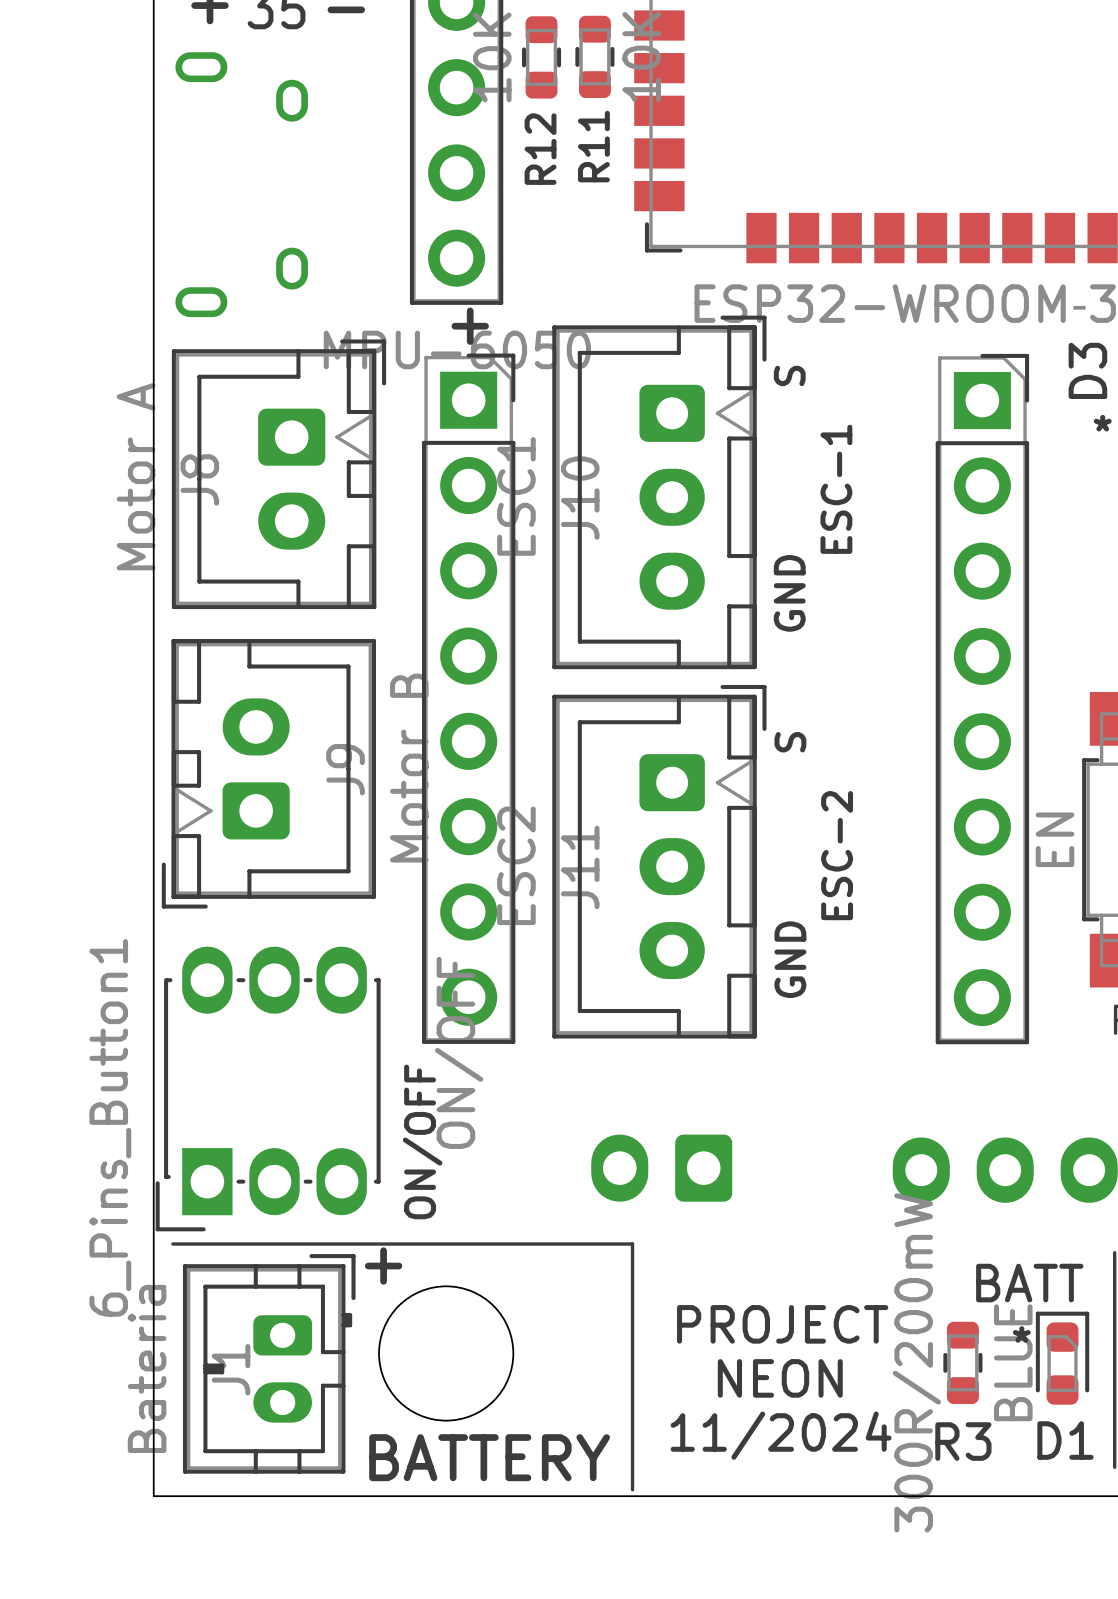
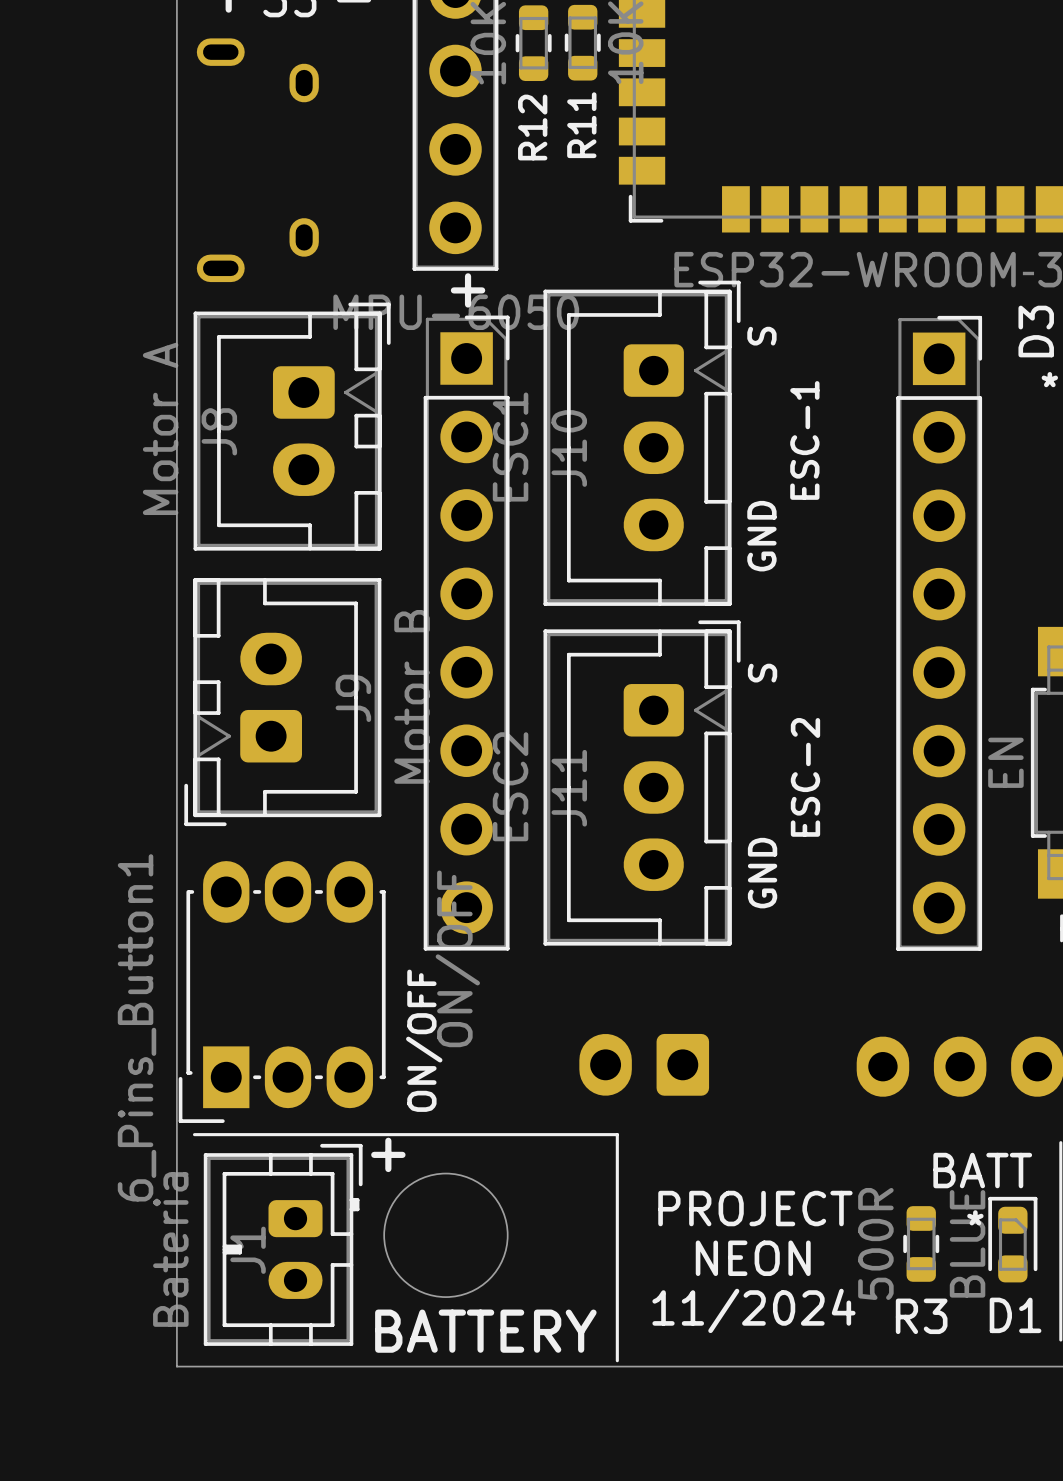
R3 value: 300R/200mW (916, 1362) -> 500R (875, 1243)

